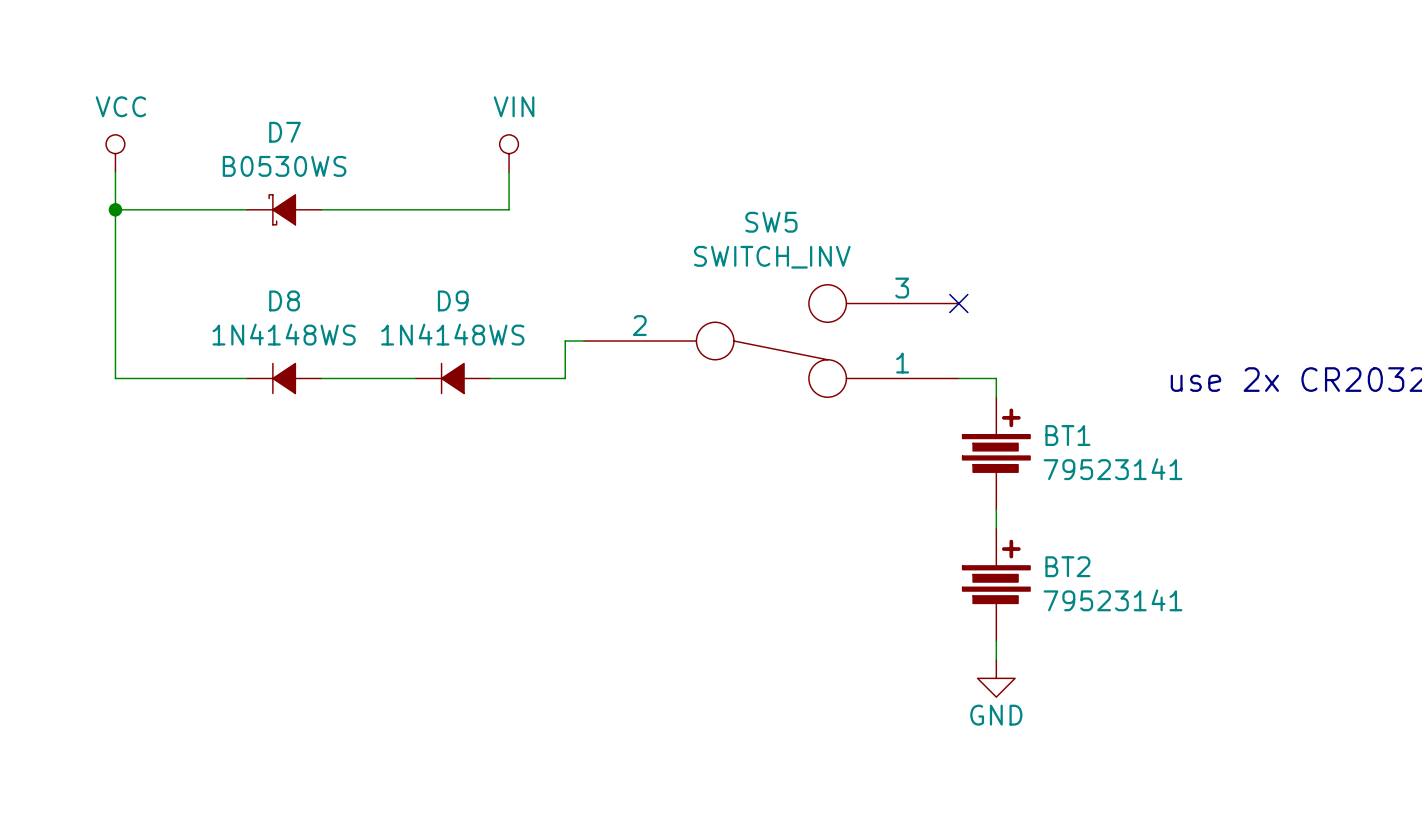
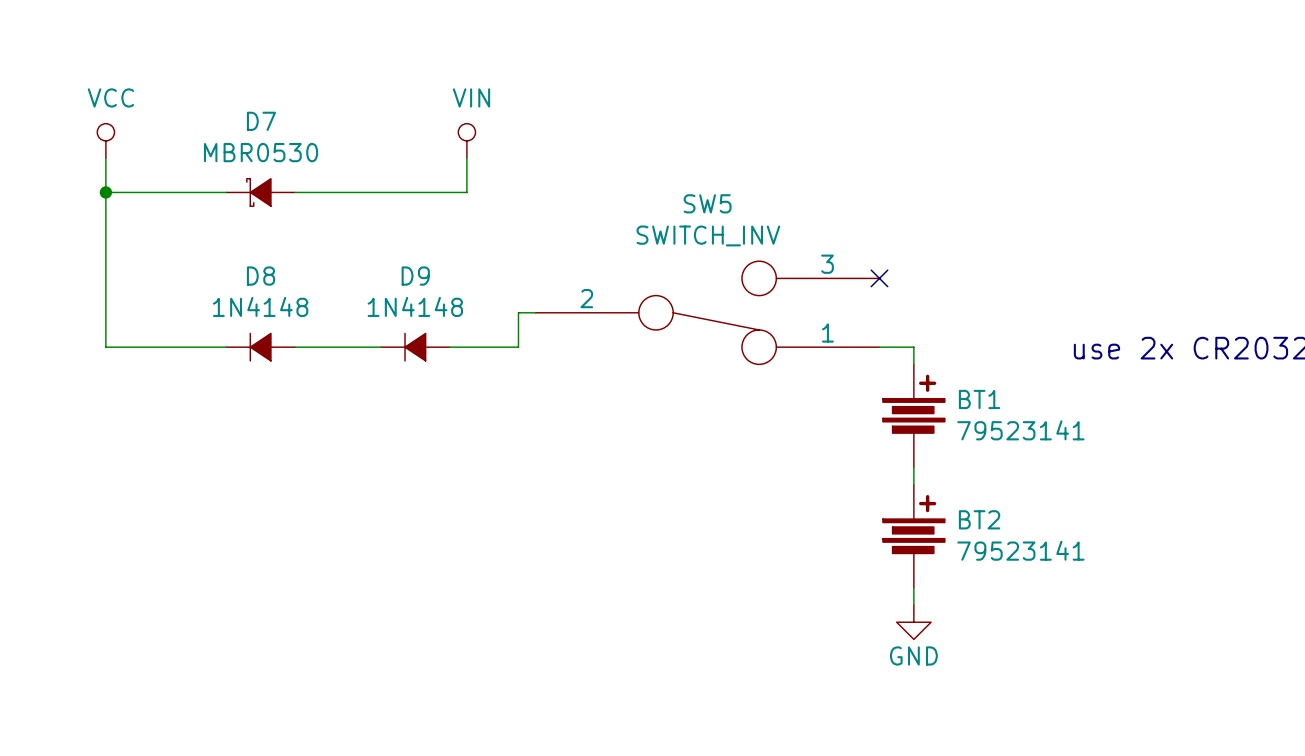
D7 value: B0530WS (284, 166) -> MBR0530 (261, 152)
D8 value: 1N4148WS (284, 334) -> 1N4148 (260, 306)
D9 value: 1N4148WS (452, 334) -> 1N4148 (415, 306)

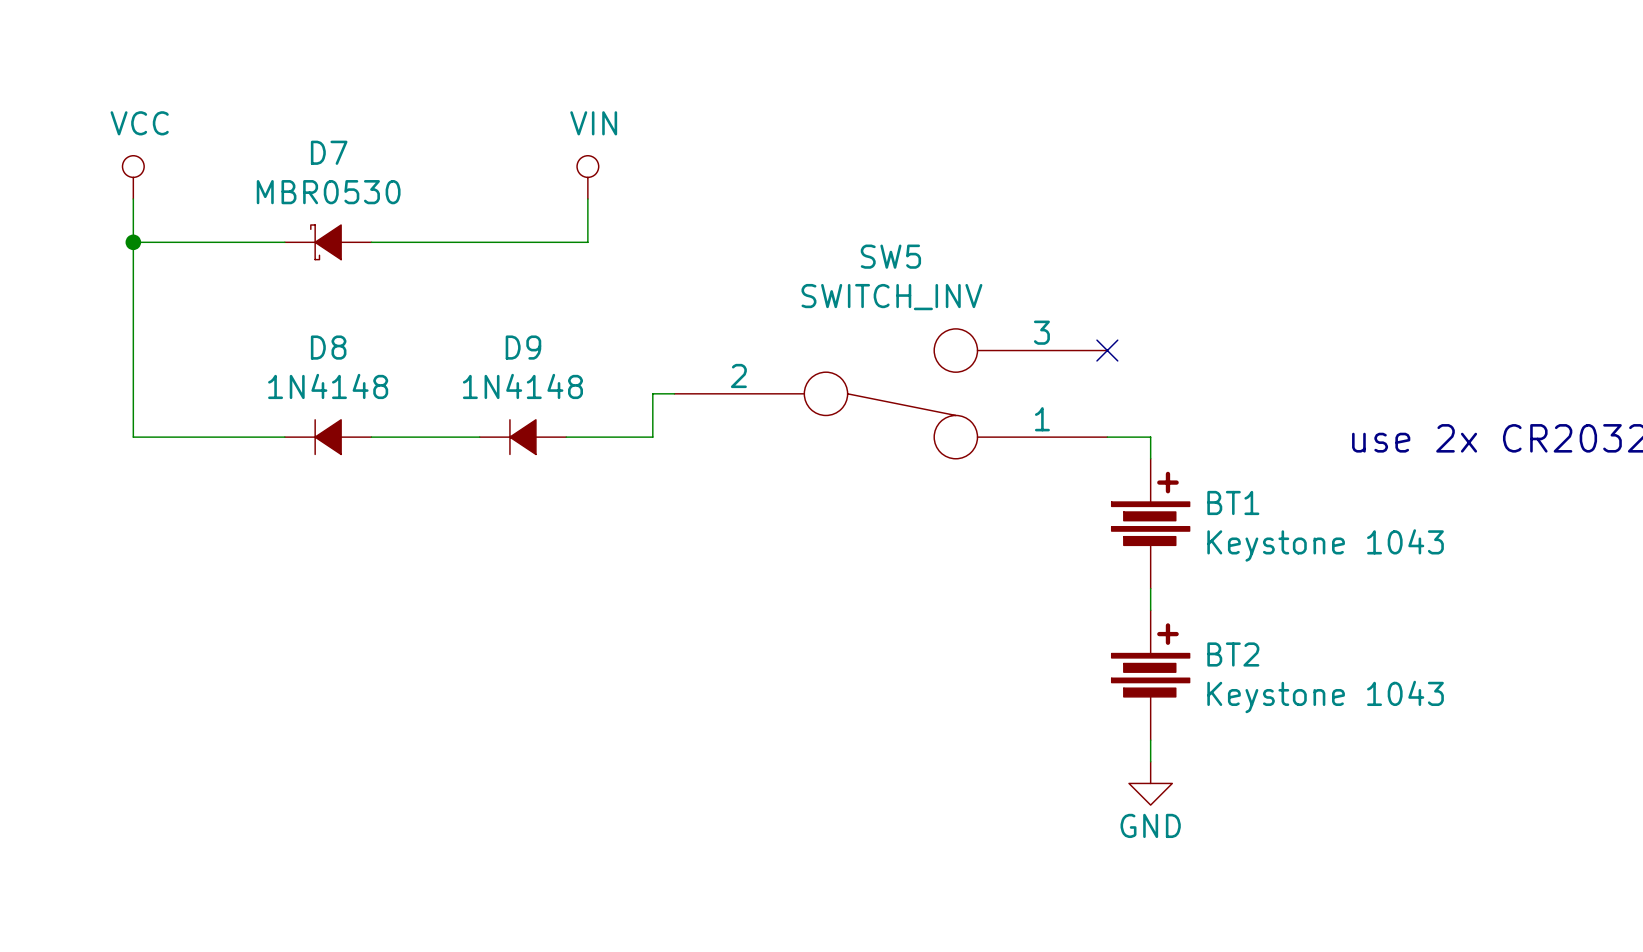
BT1 value: 79523141 (1020, 430) -> Keystone 1043 (1325, 545)
BT2 value: 79523141 (1020, 550) -> Keystone 1043 (1325, 696)

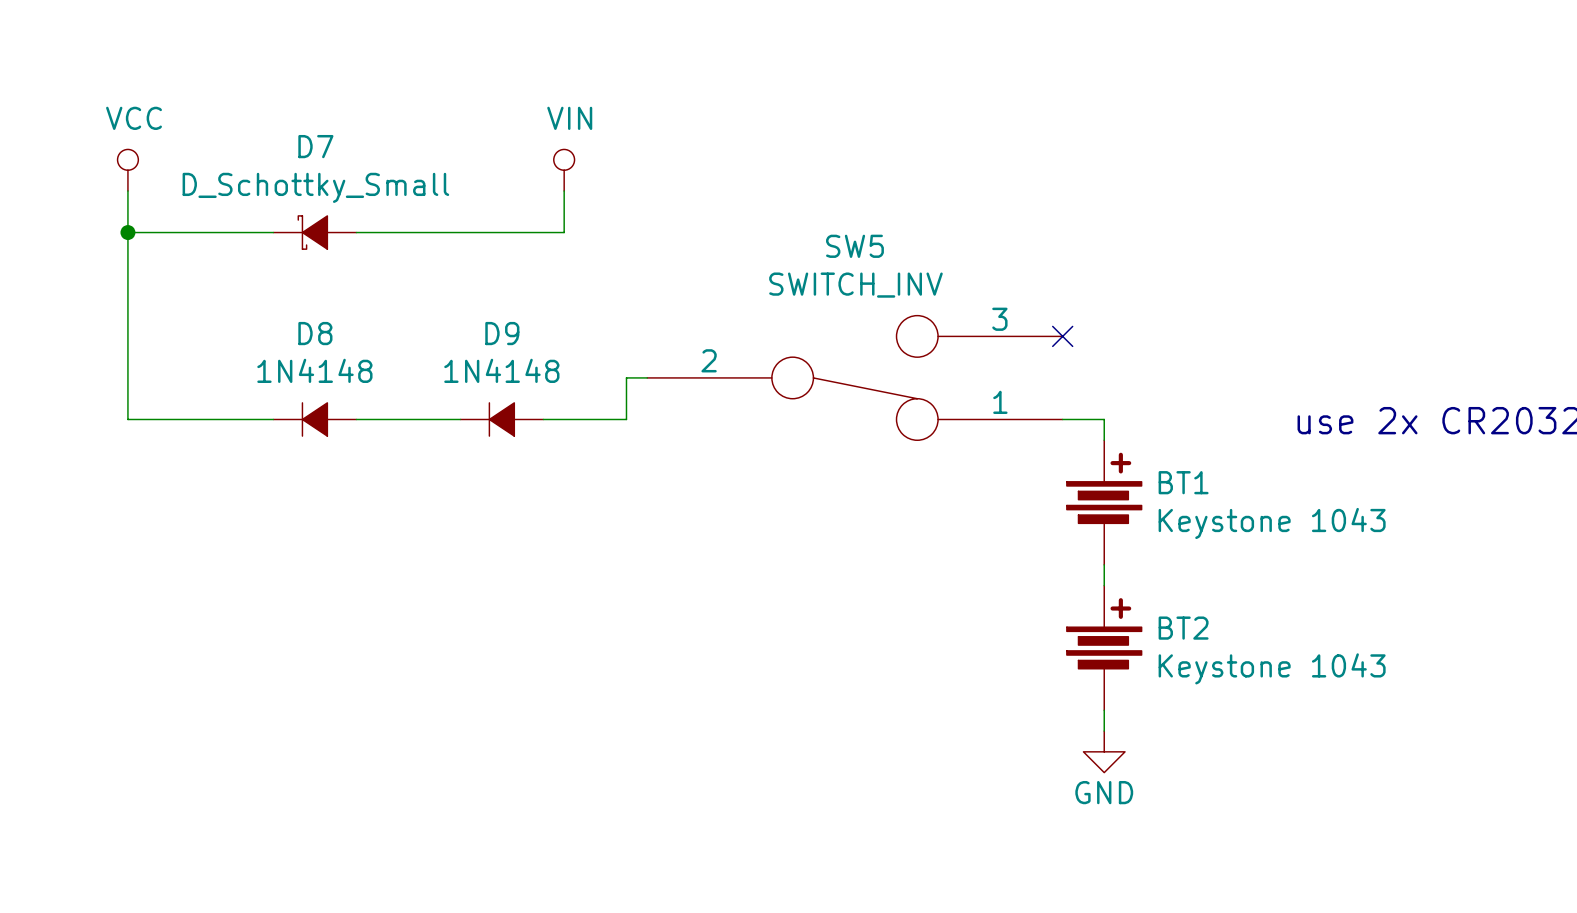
D7 value: MBR0530 (328, 192) -> D_Schottky_Small (315, 187)

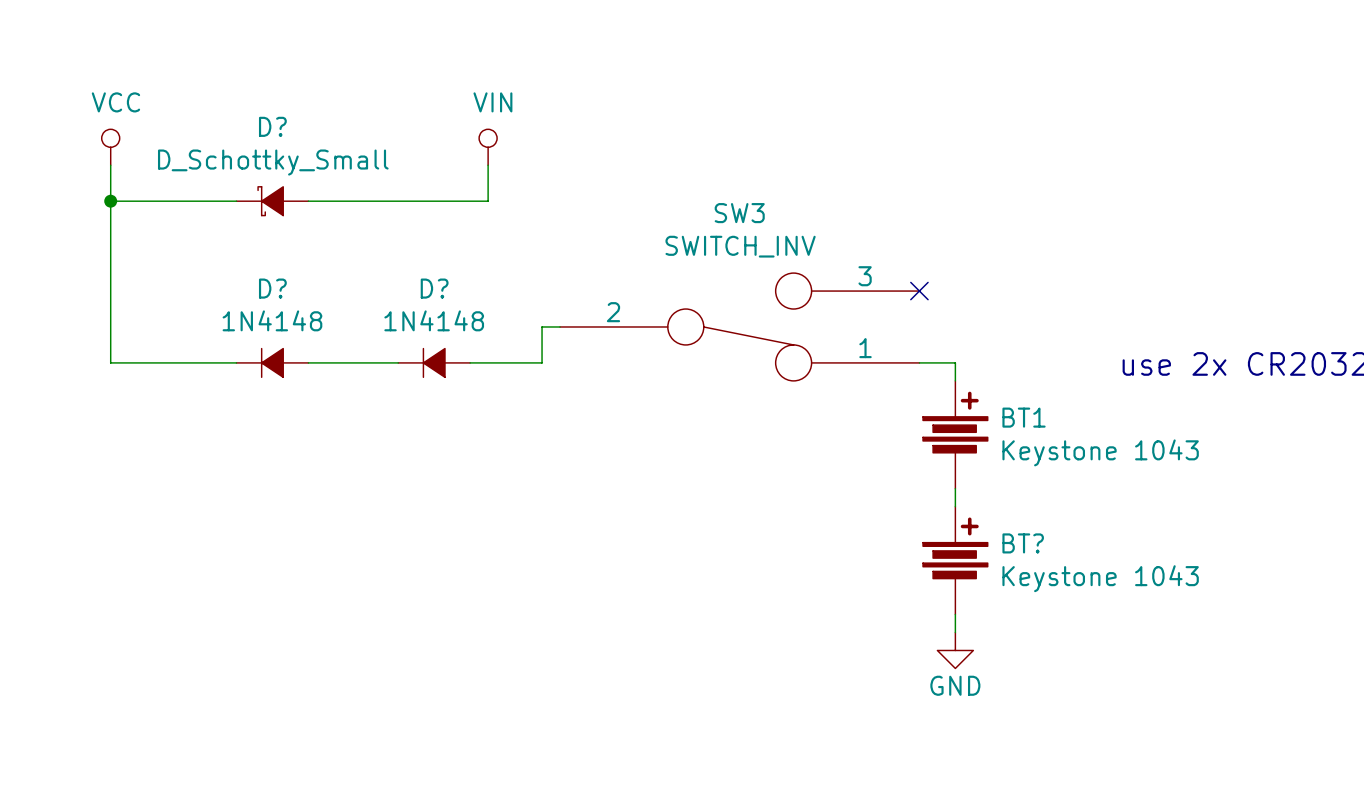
D7 name: D7 (315, 146) -> D? (272, 126)
SW5 name: SW5 (854, 246) -> SW3 (739, 213)
D8 name: D8 (315, 333) -> D? (272, 288)
D9 name: D9 (502, 333) -> D? (434, 288)
BT2 name: BT2 (1183, 628) -> BT? (1023, 543)

